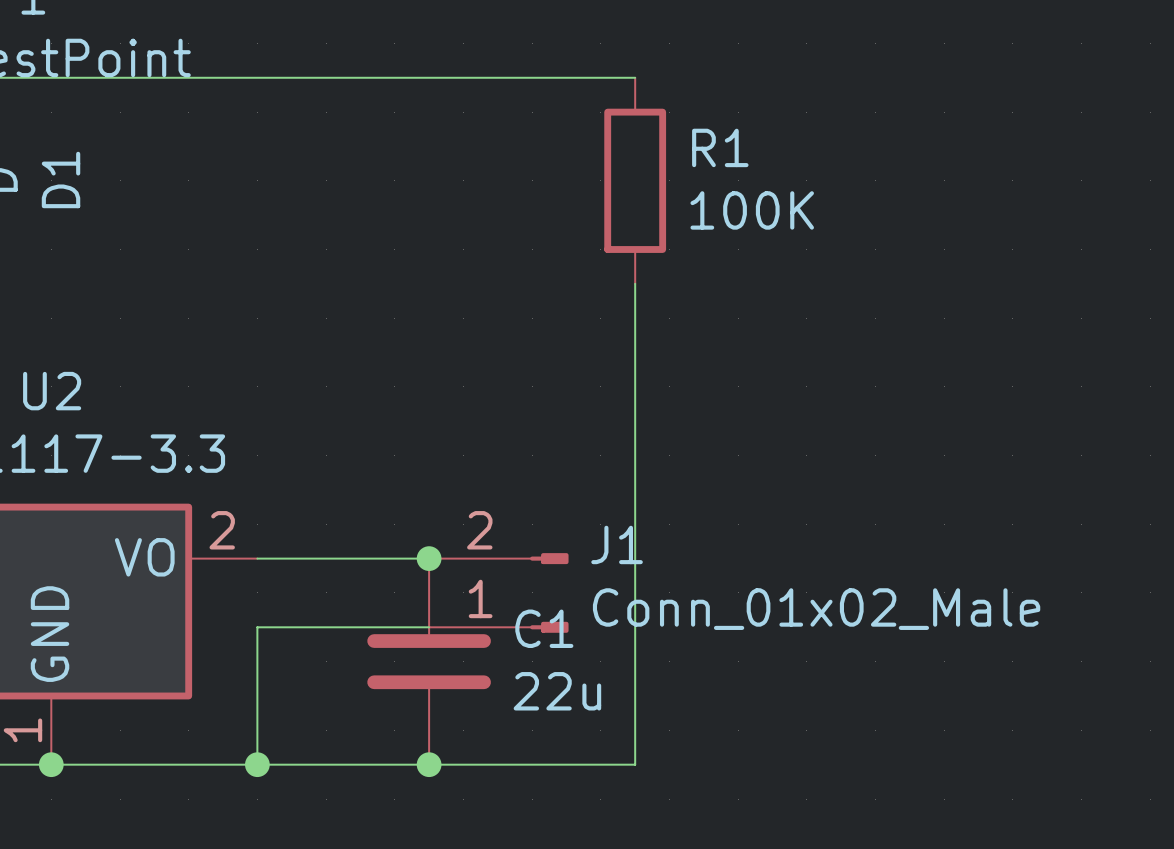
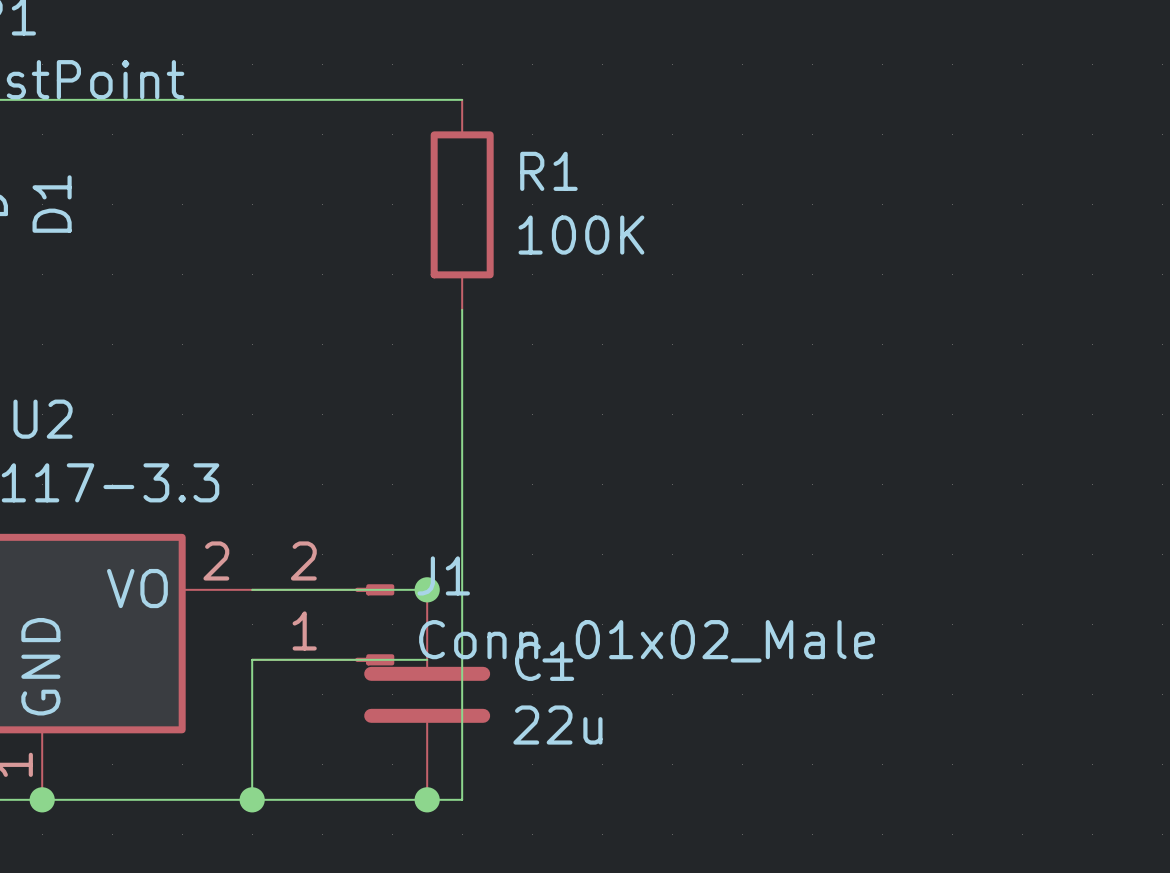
wire: (463, 77) (635, 77) -> none
R1 position: (635, 180) -> (462, 204)
wire: (635, 283) (635, 764) (463, 764) -> (462, 309) (462, 799)
J1 position: (498, 592) -> (323, 624)

